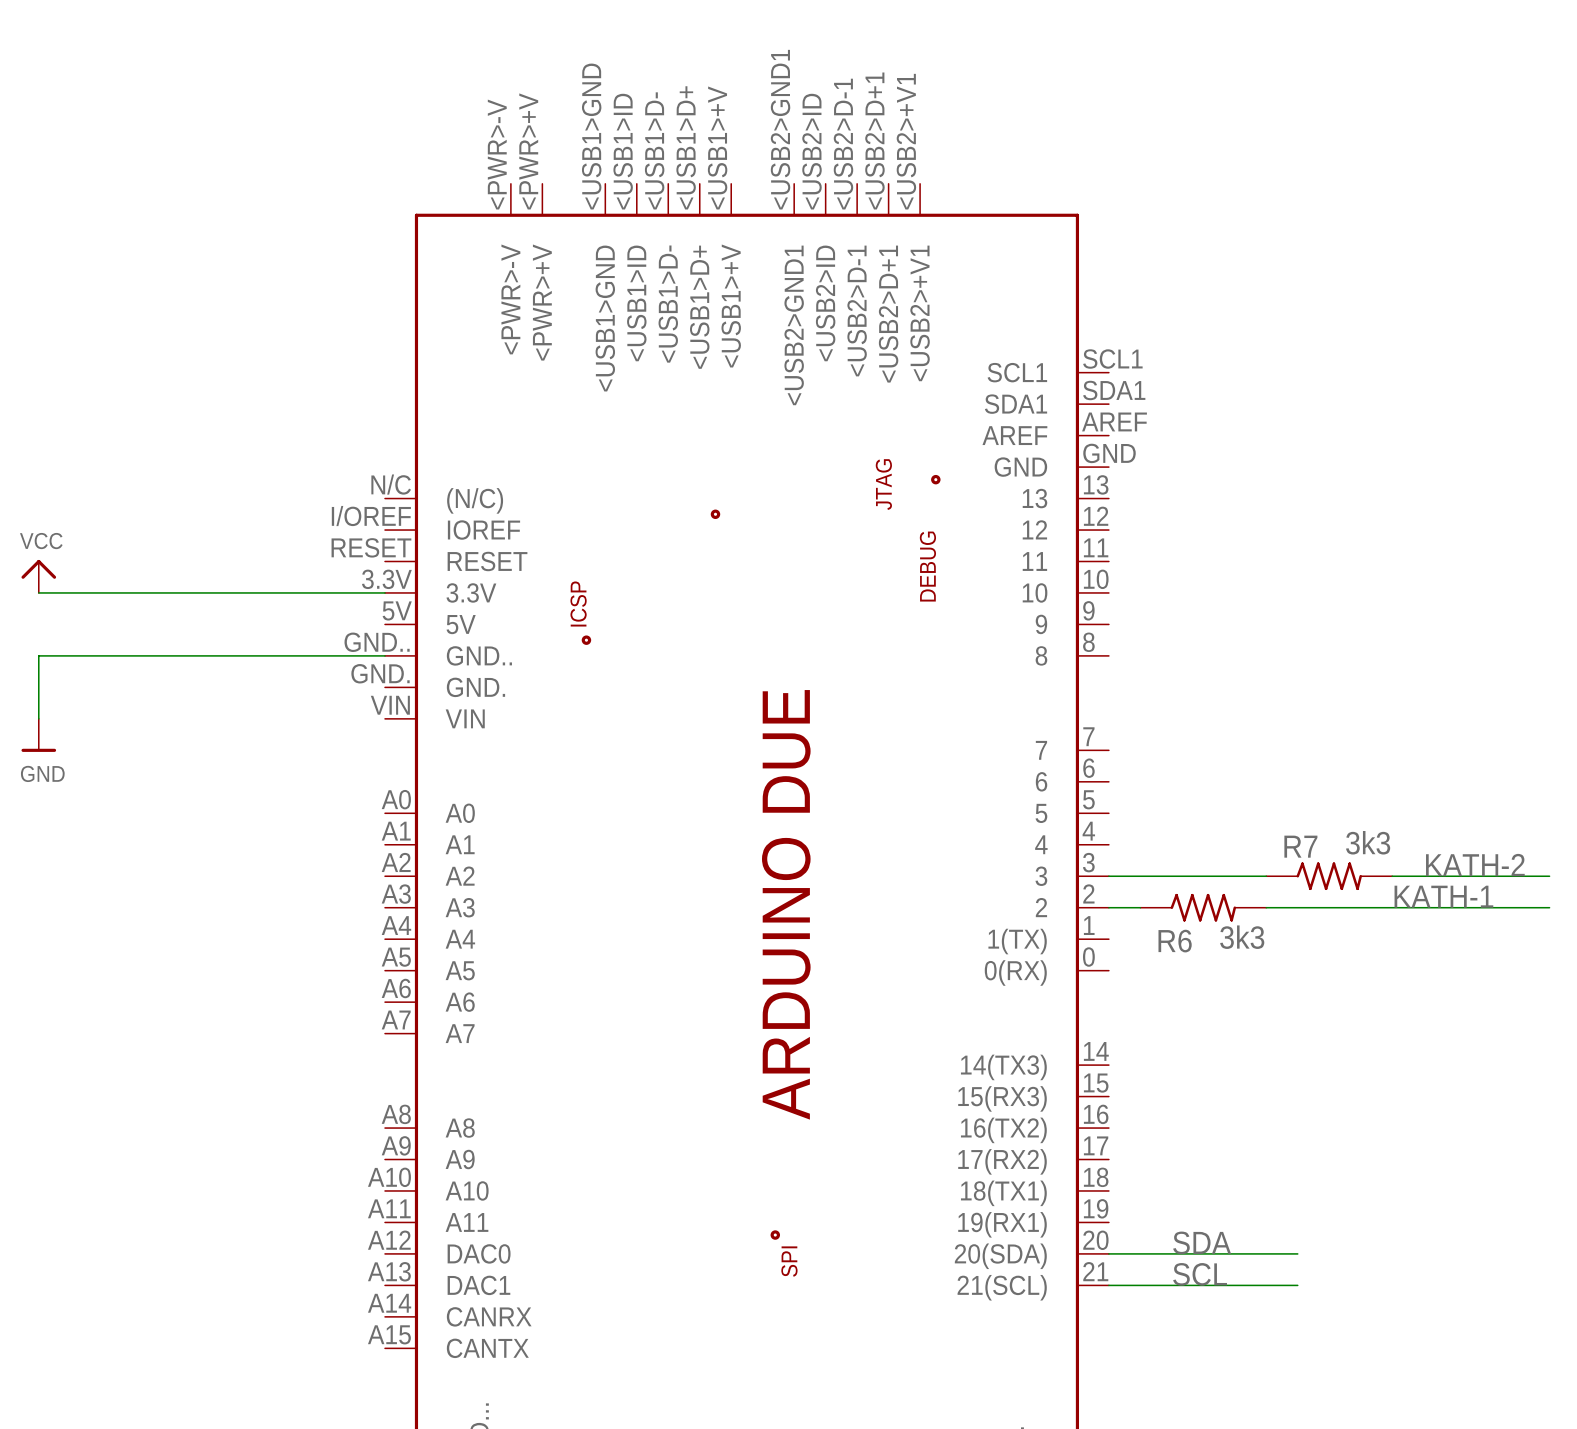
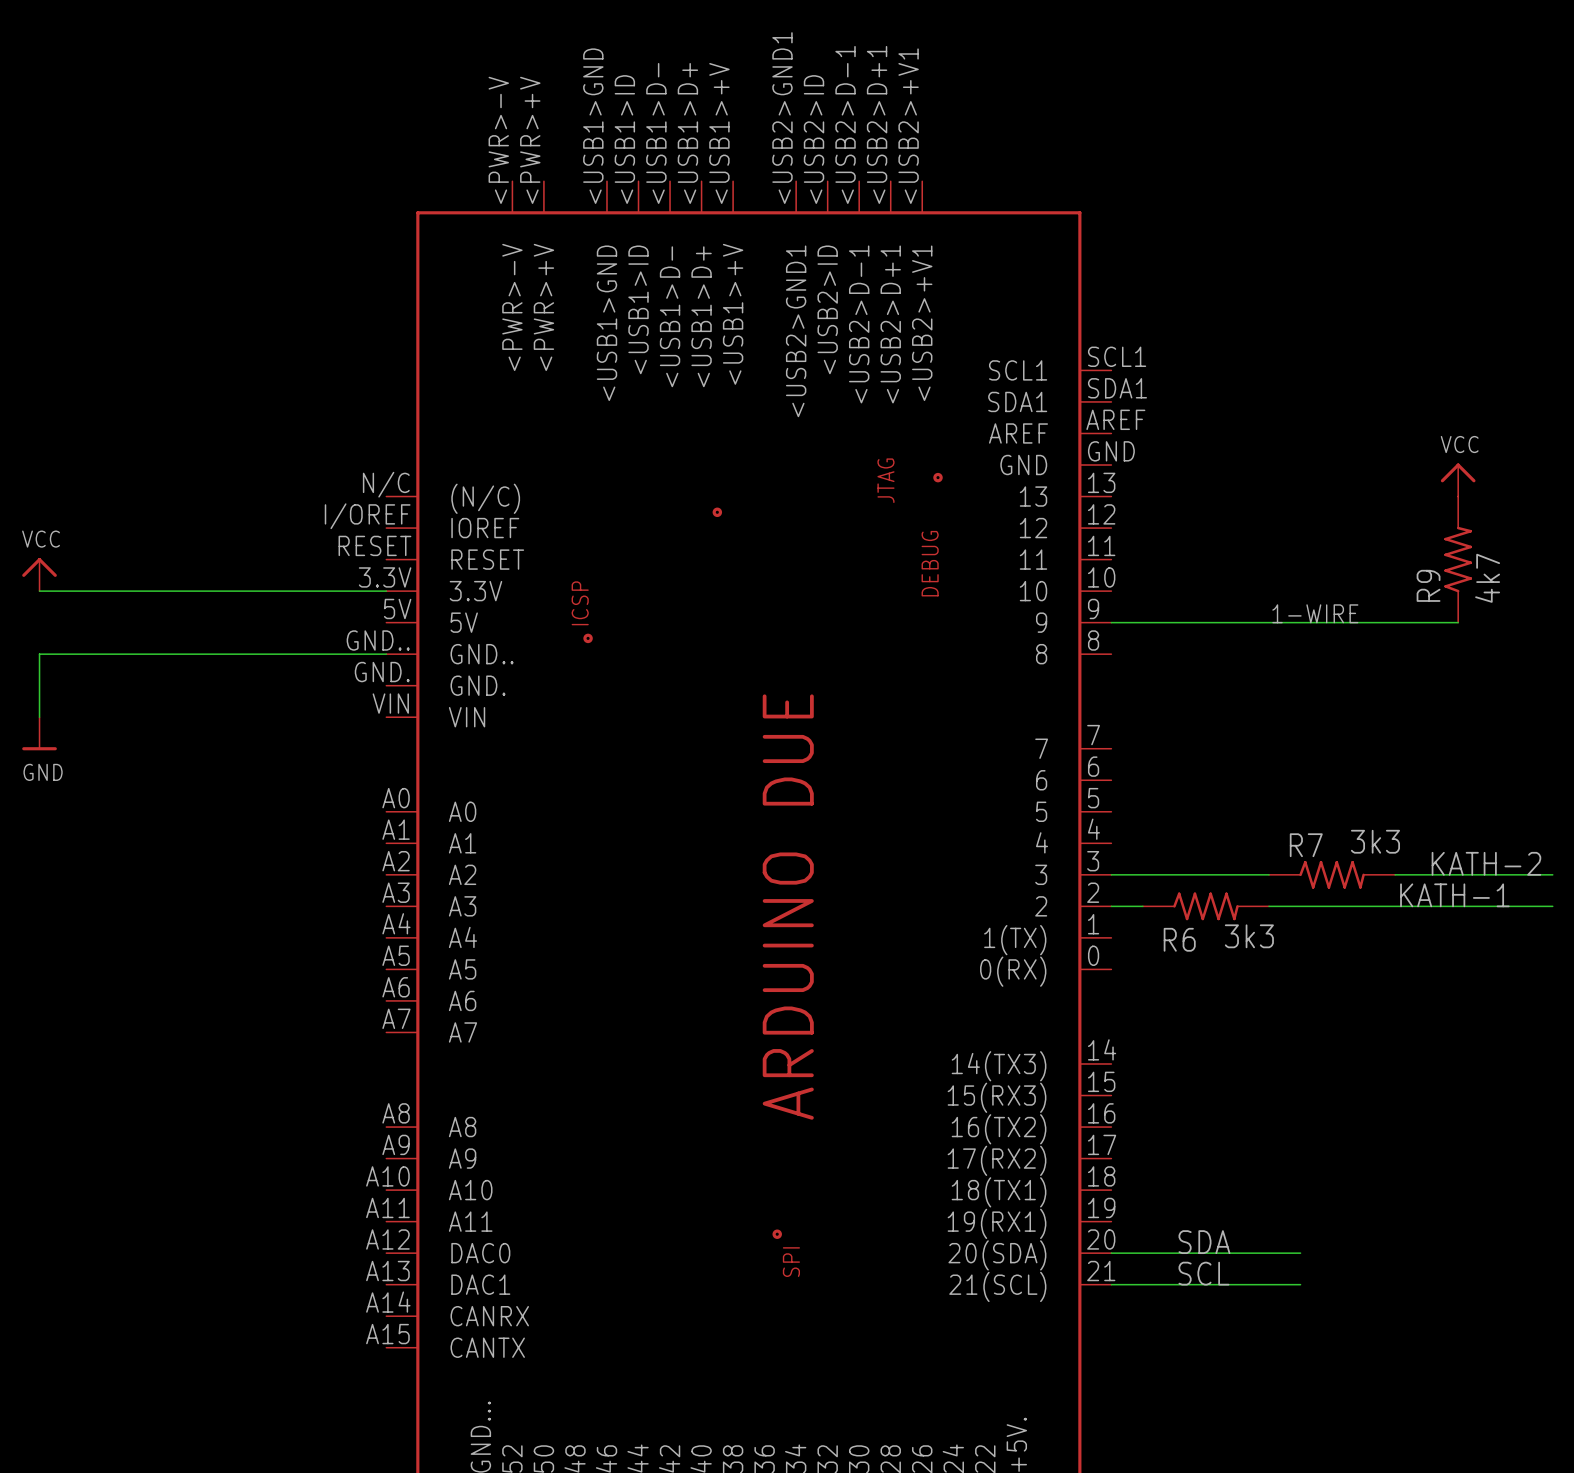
power symbol: none -> VCC (1458, 479)
R9: none -> 4k7 (1458, 559)
label: none -> 1-WIRE (1315, 613)
wire: none -> (1111, 622) (1458, 622)

